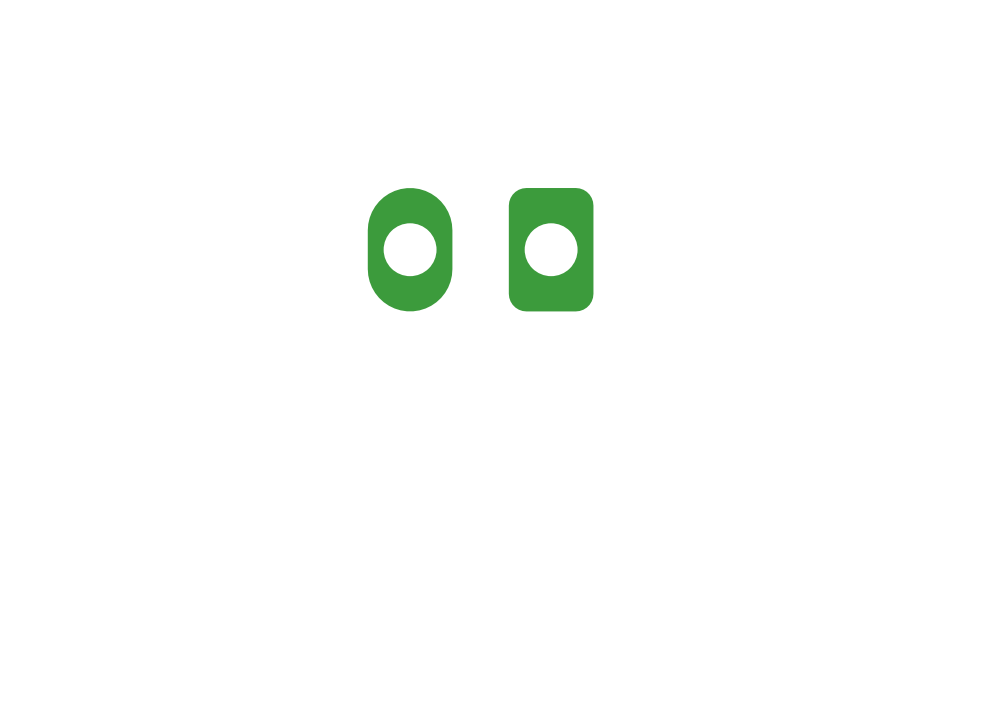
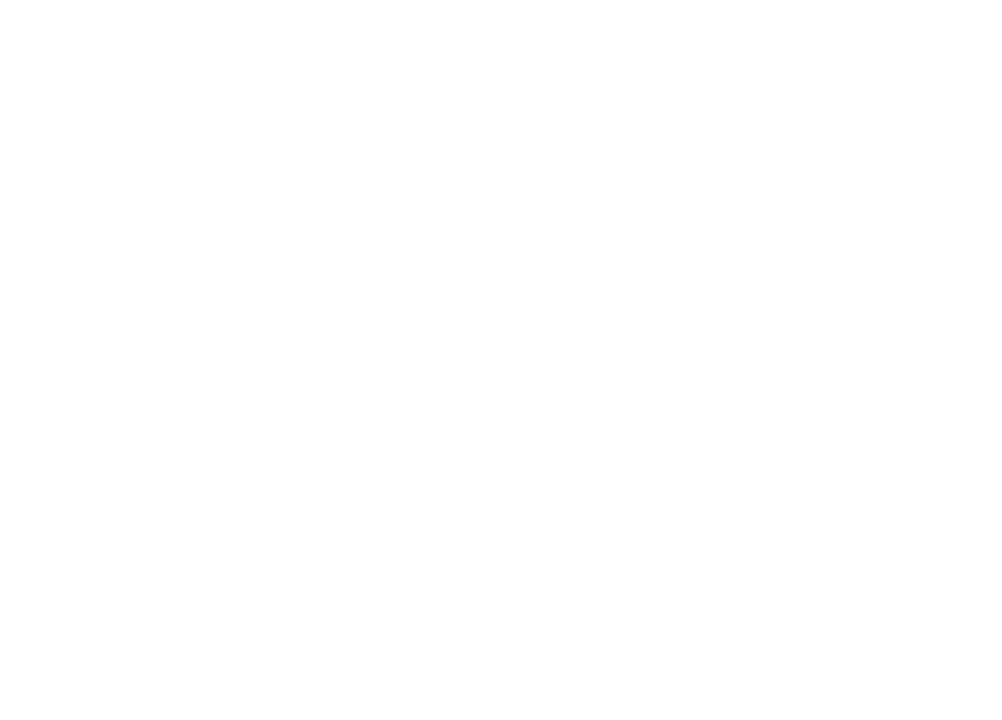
part: (480, 249) -> none

